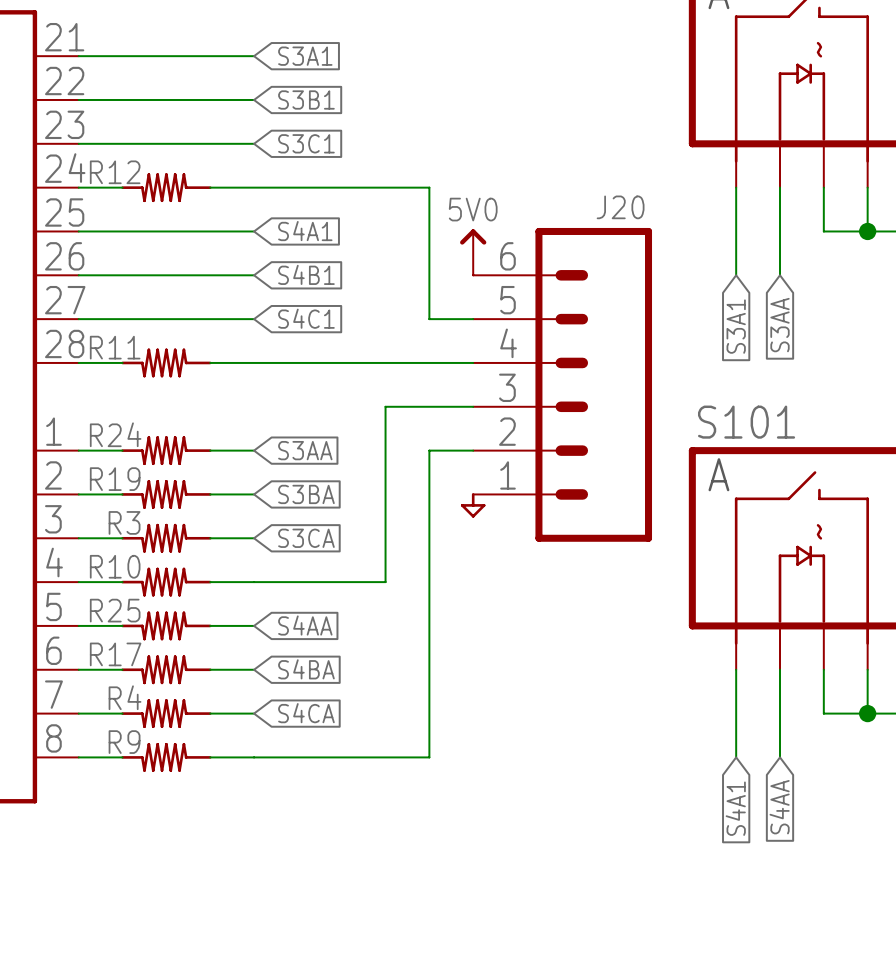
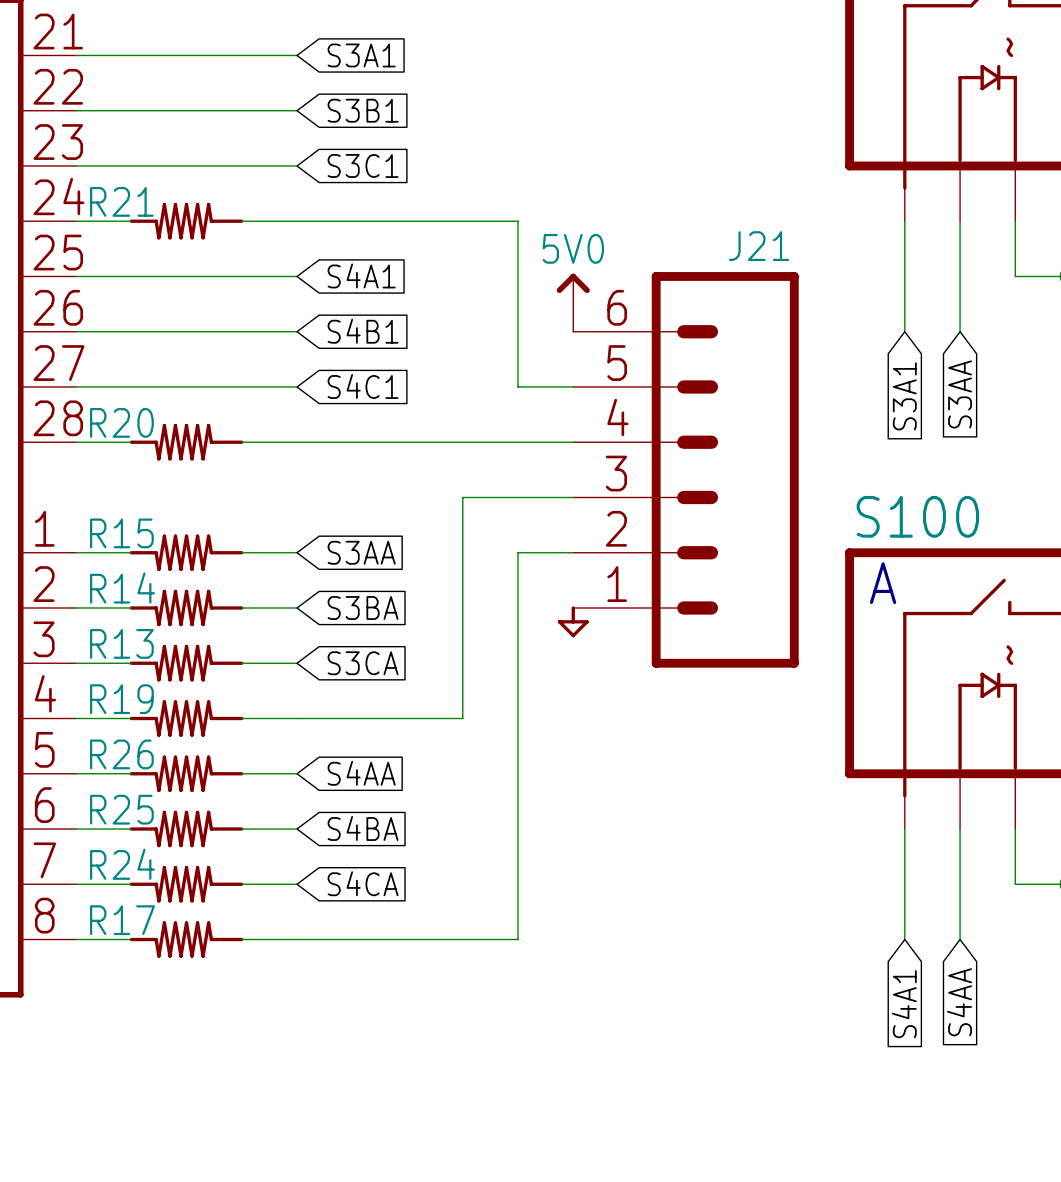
R12 name: R12 (115, 172) -> R21 (121, 201)
J20 name: J20 (620, 207) -> J21 (759, 246)
R11 name: R11 (115, 347) -> R20 (121, 422)
S101 name: S101 (746, 422) -> S100 (917, 516)
R24 name: R24 (115, 434) -> R15 (121, 533)
R19 name: R19 (115, 479) -> R14 (122, 588)
R3 name: R3 (124, 522) -> R13 (121, 643)
R10 name: R10 (115, 566) -> R19 (121, 699)
R25 name: R25 (115, 610) -> R26 (121, 754)
R17 name: R17 (115, 654) -> R25 (121, 809)
R4 name: R4 (125, 697) -> R24 (122, 864)
R9 name: R9 (124, 742) -> R17 (122, 920)

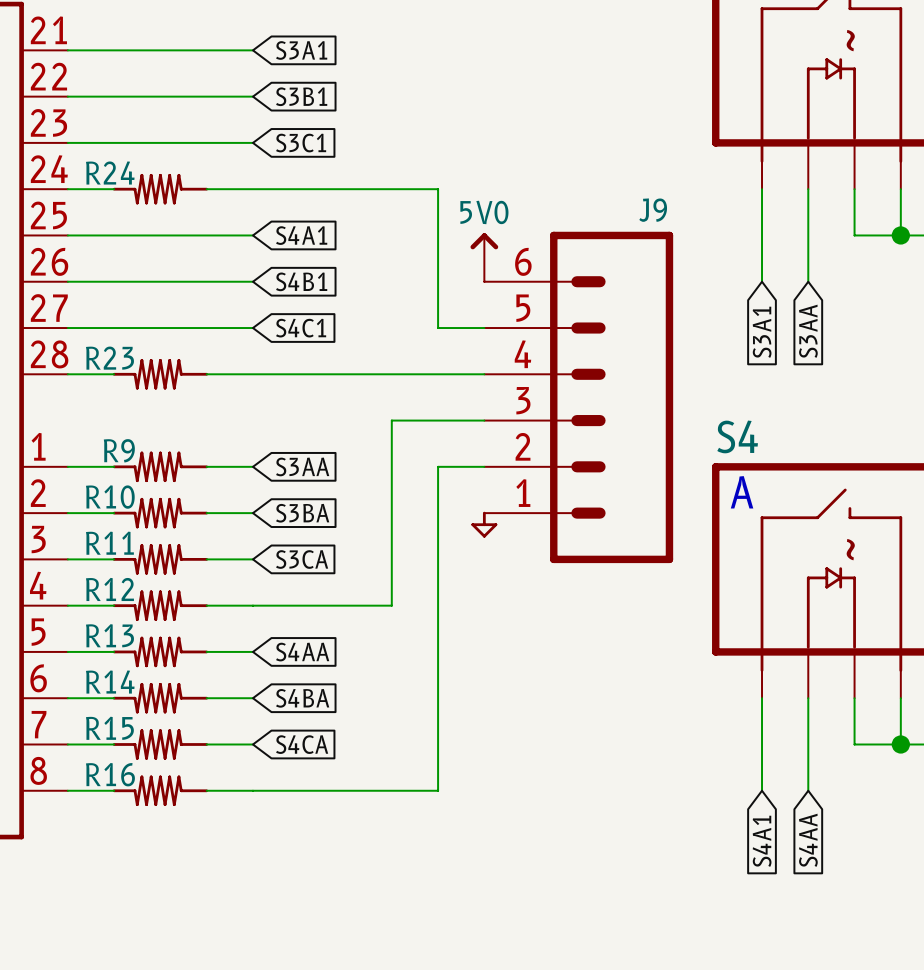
R21 name: R21 (121, 201) -> R24 (110, 172)
J21 name: J21 (759, 246) -> J9 (653, 210)
R20 name: R20 (121, 422) -> R23 (109, 358)
S100 name: S100 (917, 516) -> S4 (737, 436)
R15 name: R15 (121, 533) -> R9 (119, 450)
R14 name: R14 (122, 588) -> R10 (110, 497)
R13 name: R13 (121, 643) -> R11 (109, 543)
R19 name: R19 (121, 699) -> R12 (109, 589)
R26 name: R26 (121, 754) -> R13 (109, 635)
R25 name: R25 (121, 809) -> R14 (110, 682)
R24 name: R24 (122, 864) -> R15 (109, 728)
R17 name: R17 (122, 920) -> R16 (110, 774)

